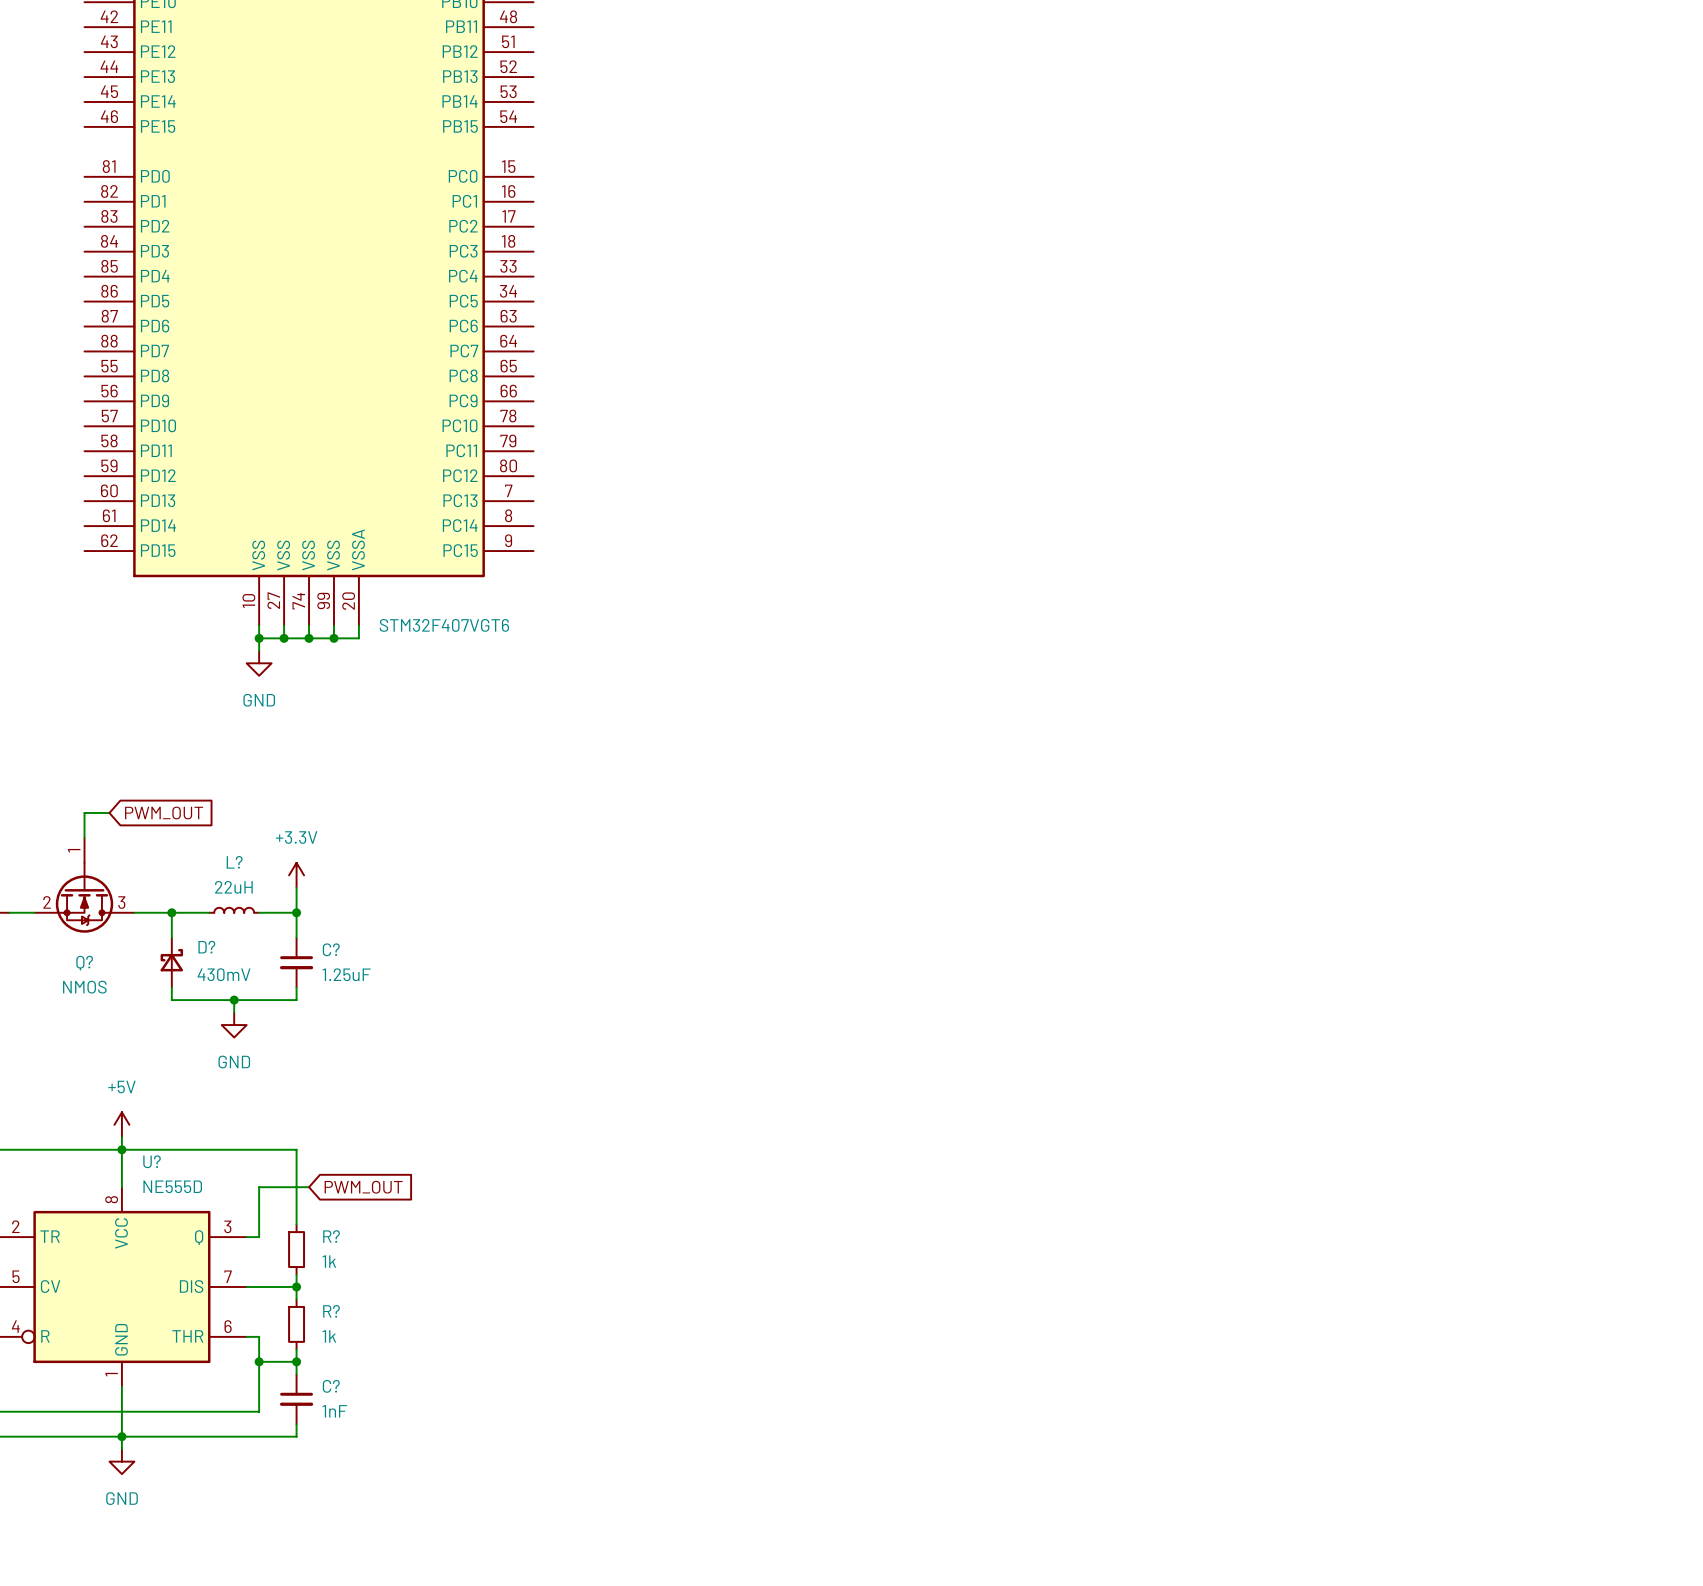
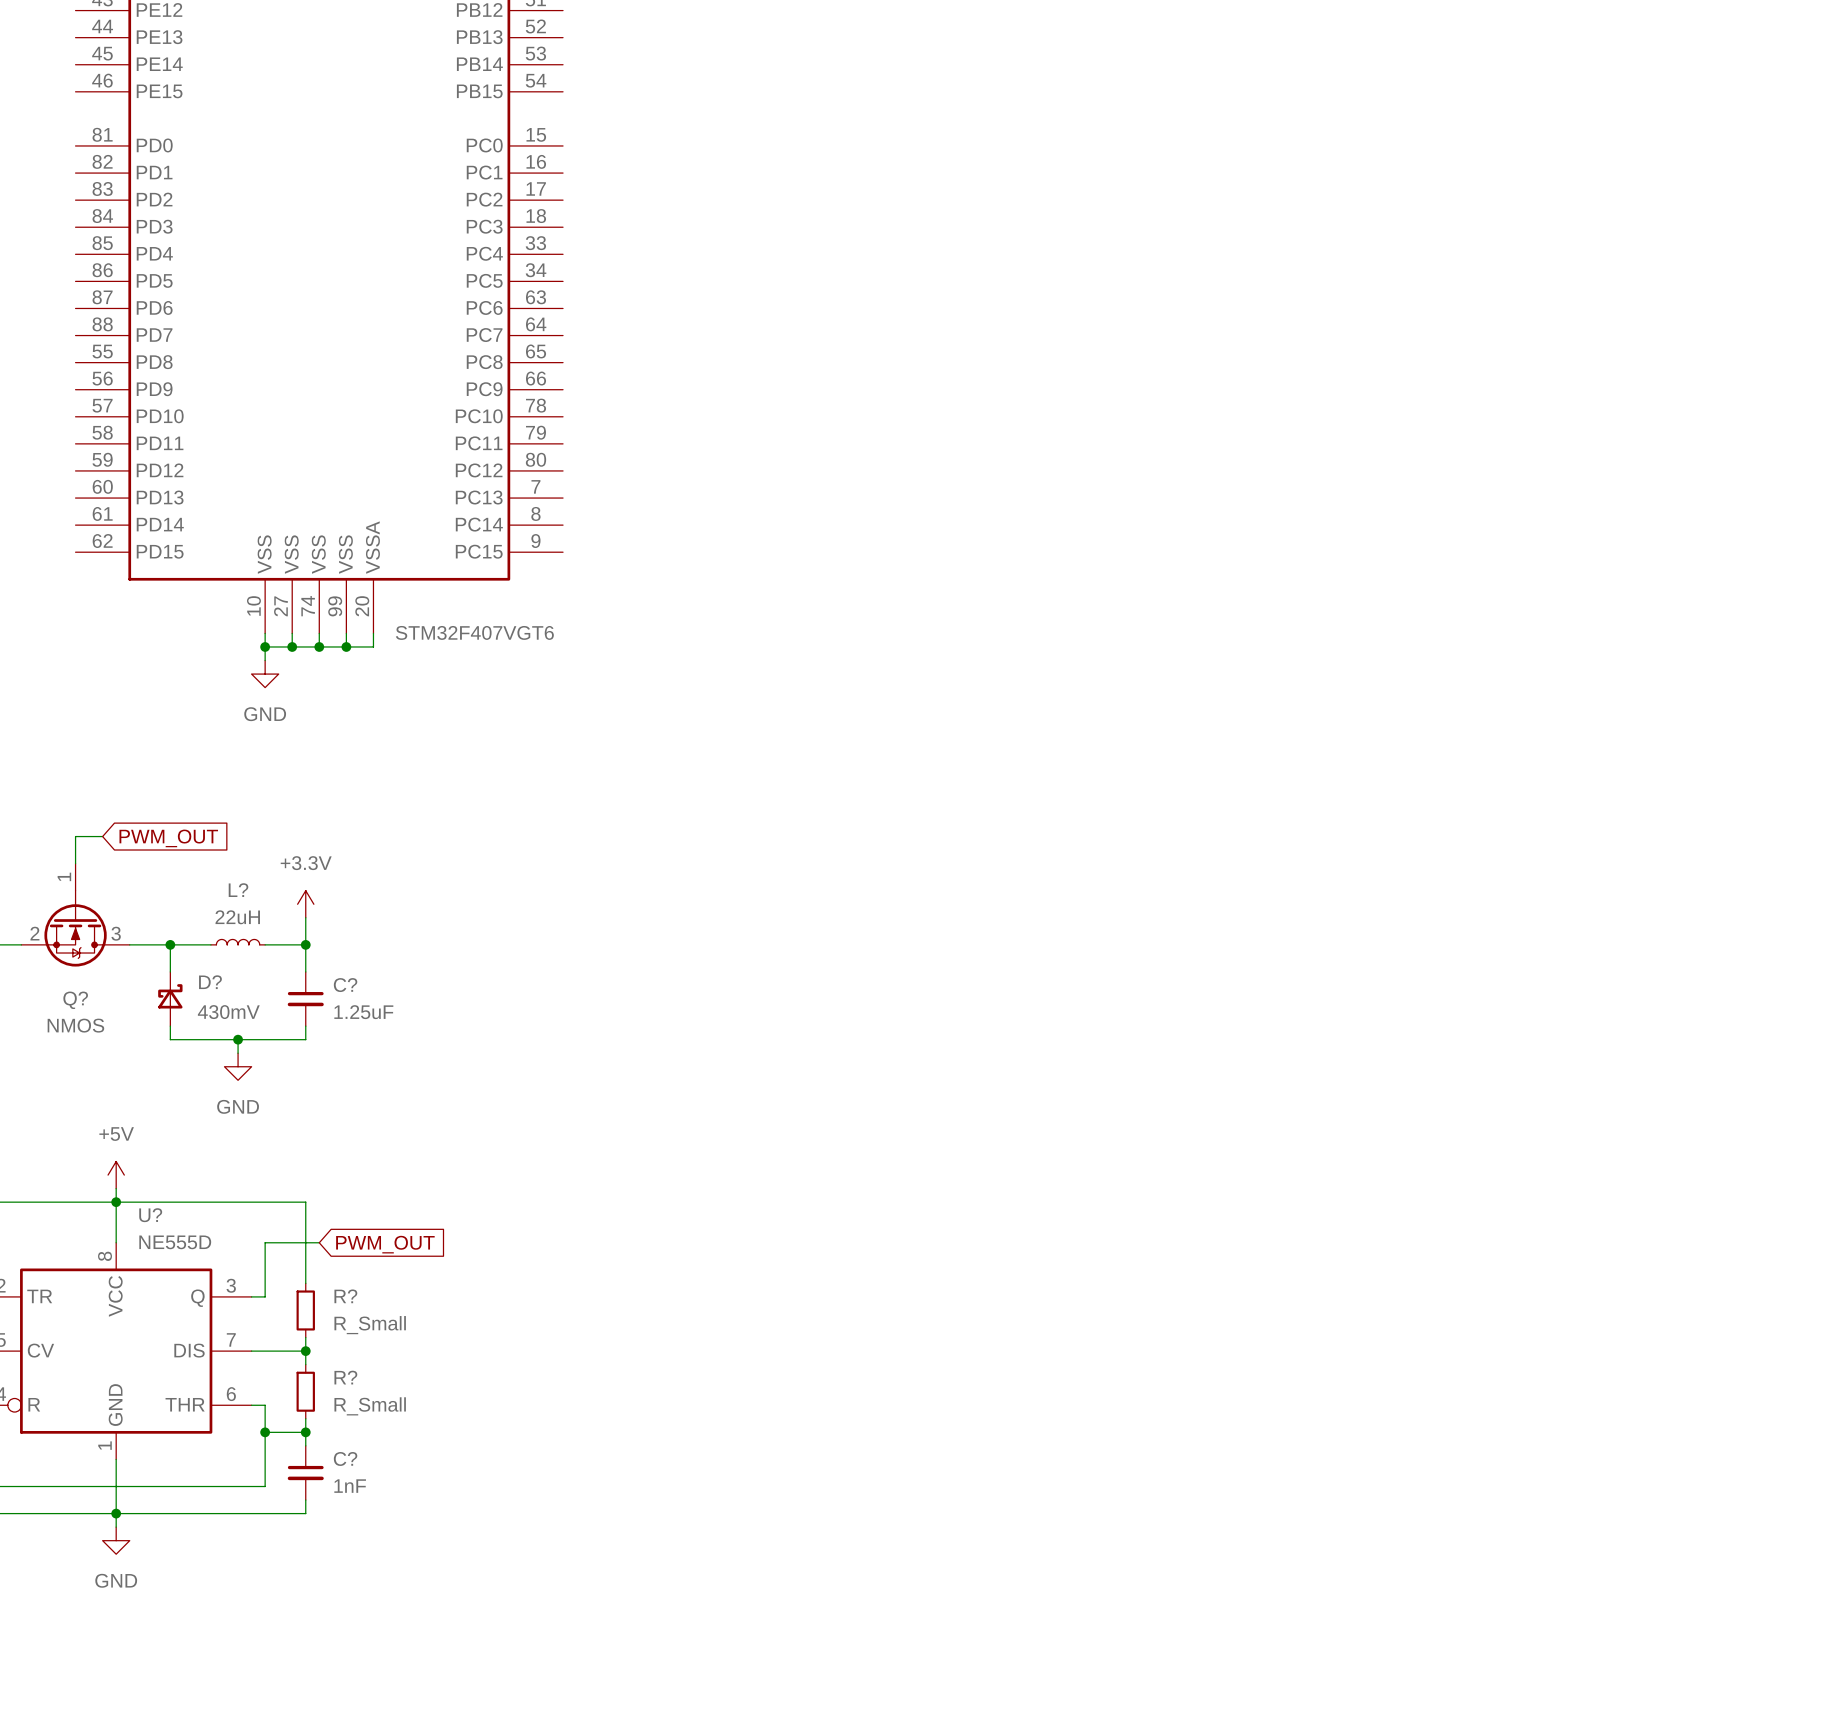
R? value: 1k (329, 1261) -> R_Small (370, 1325)
R? value: 1k (329, 1336) -> R_Small (370, 1406)

